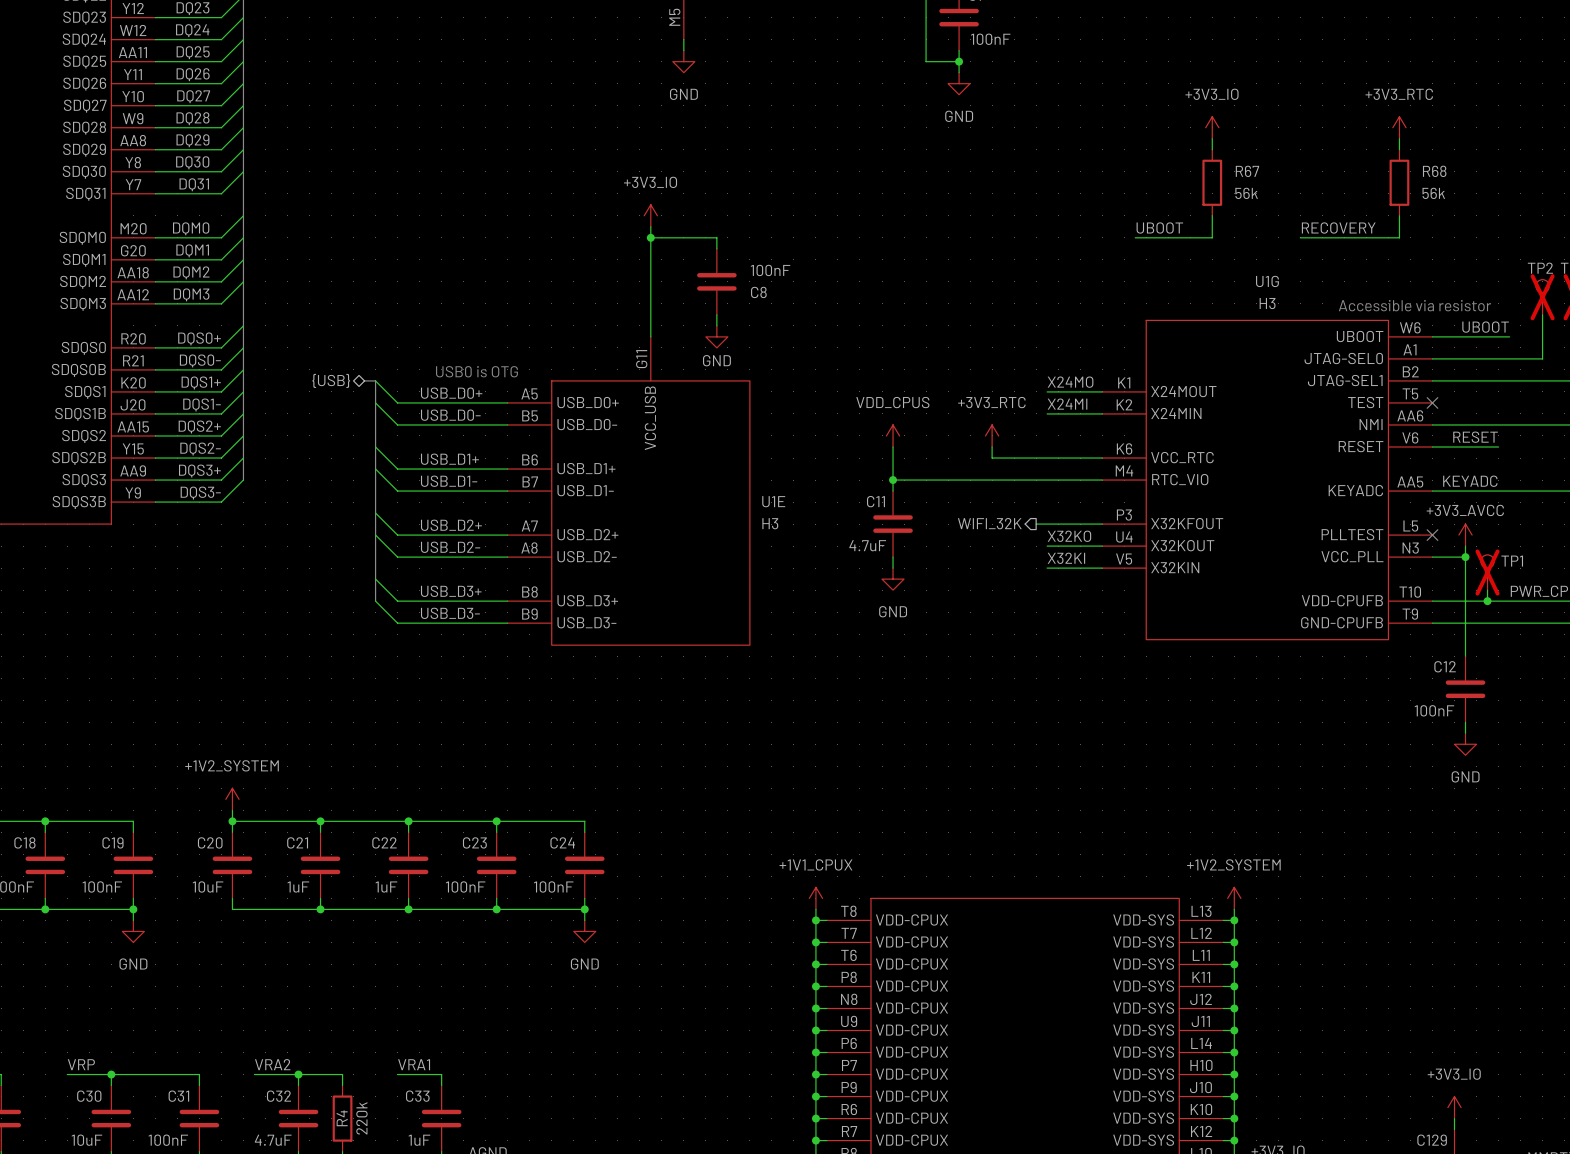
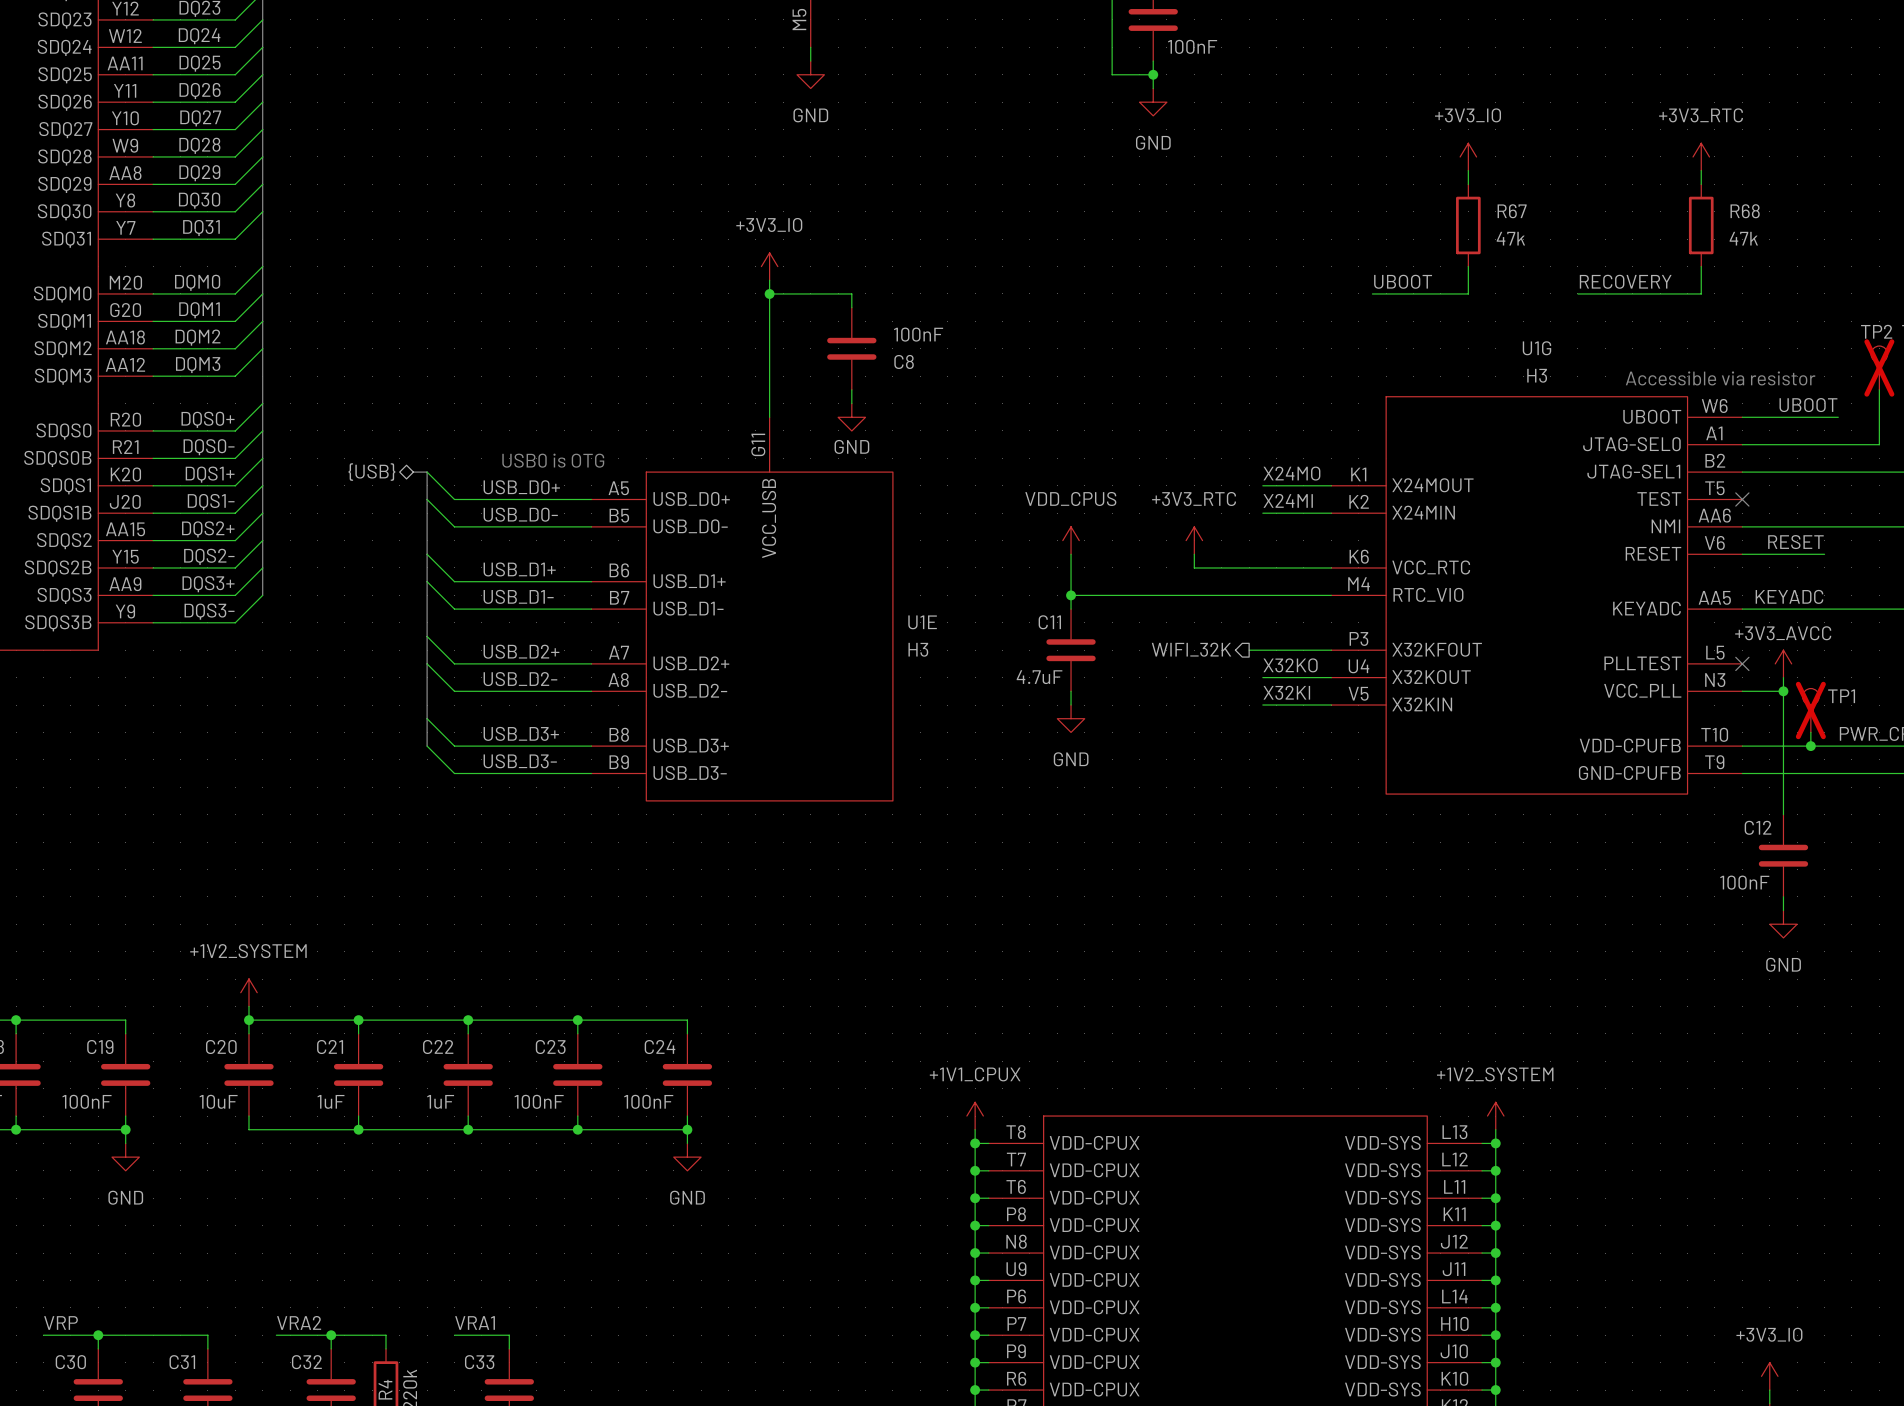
R67 value: 56k (1246, 193) -> 47k (1510, 238)
R68 value: 56k (1433, 193) -> 47k (1743, 238)

